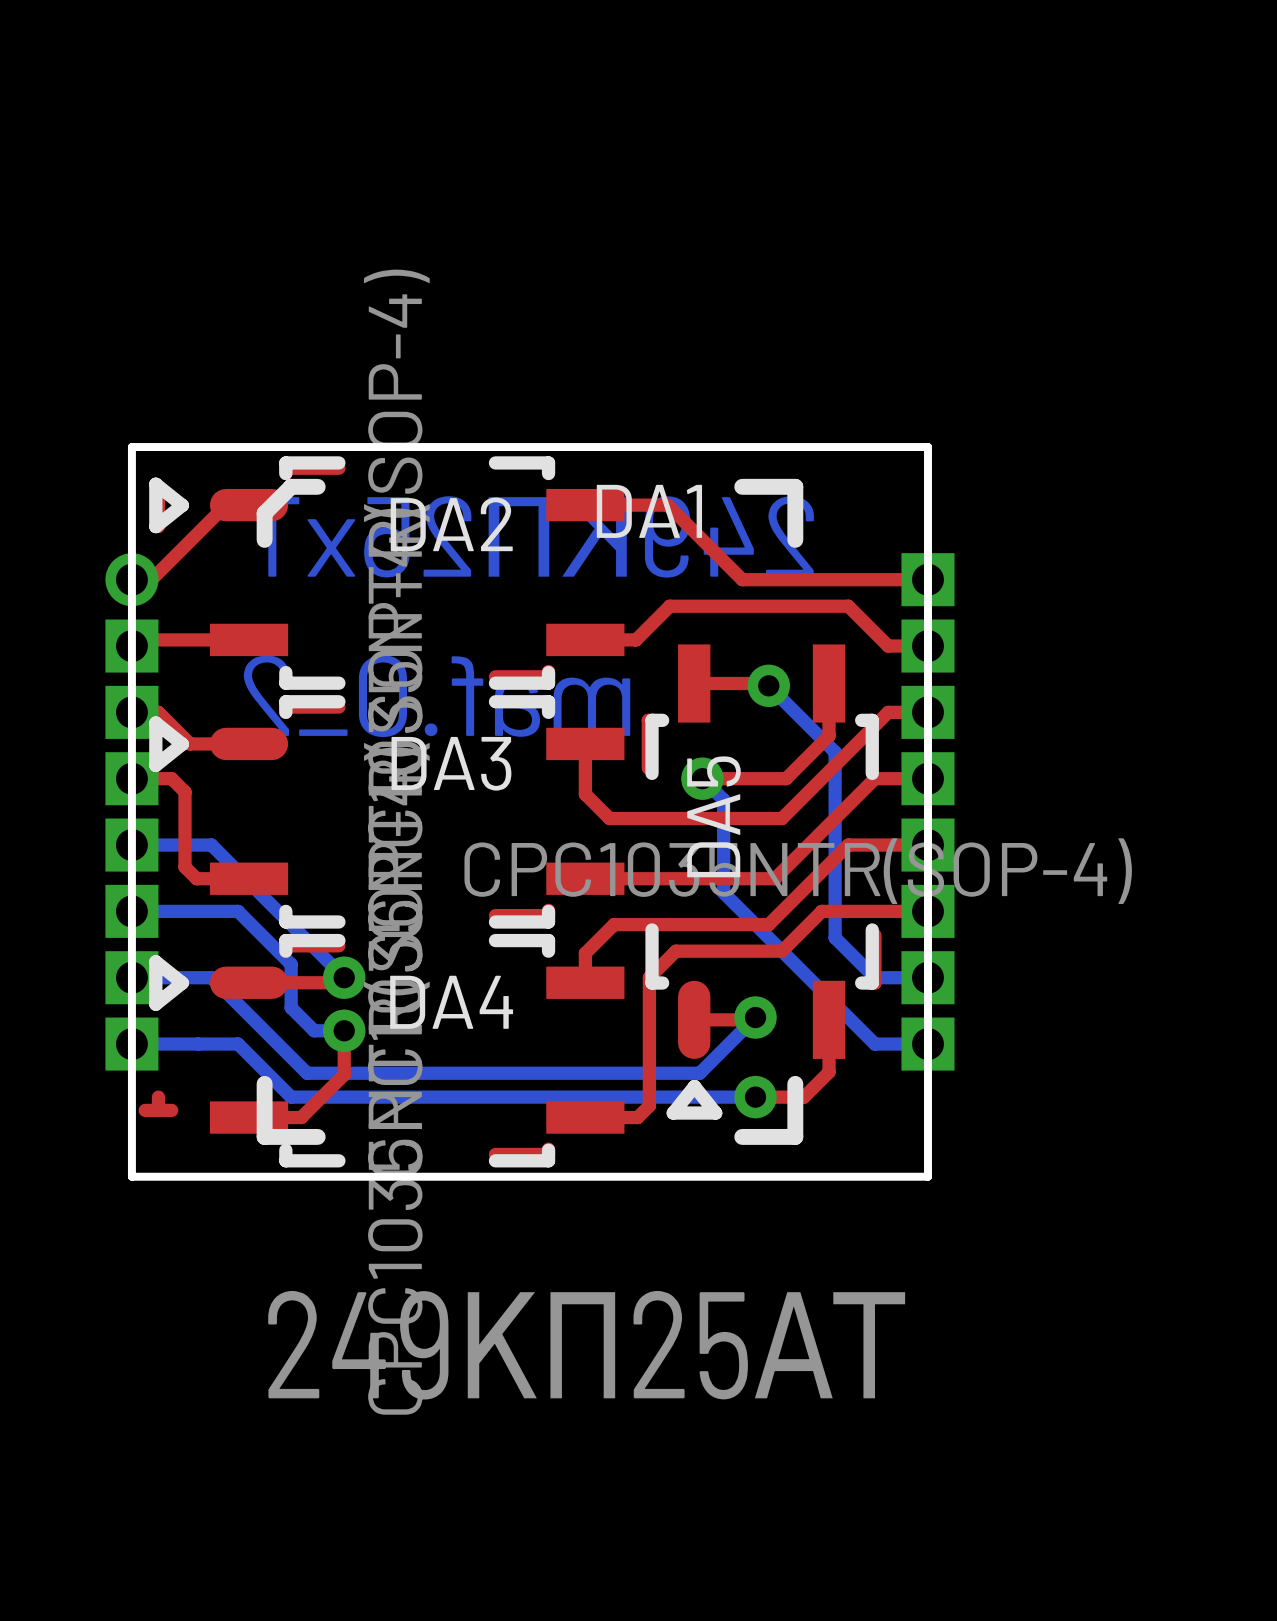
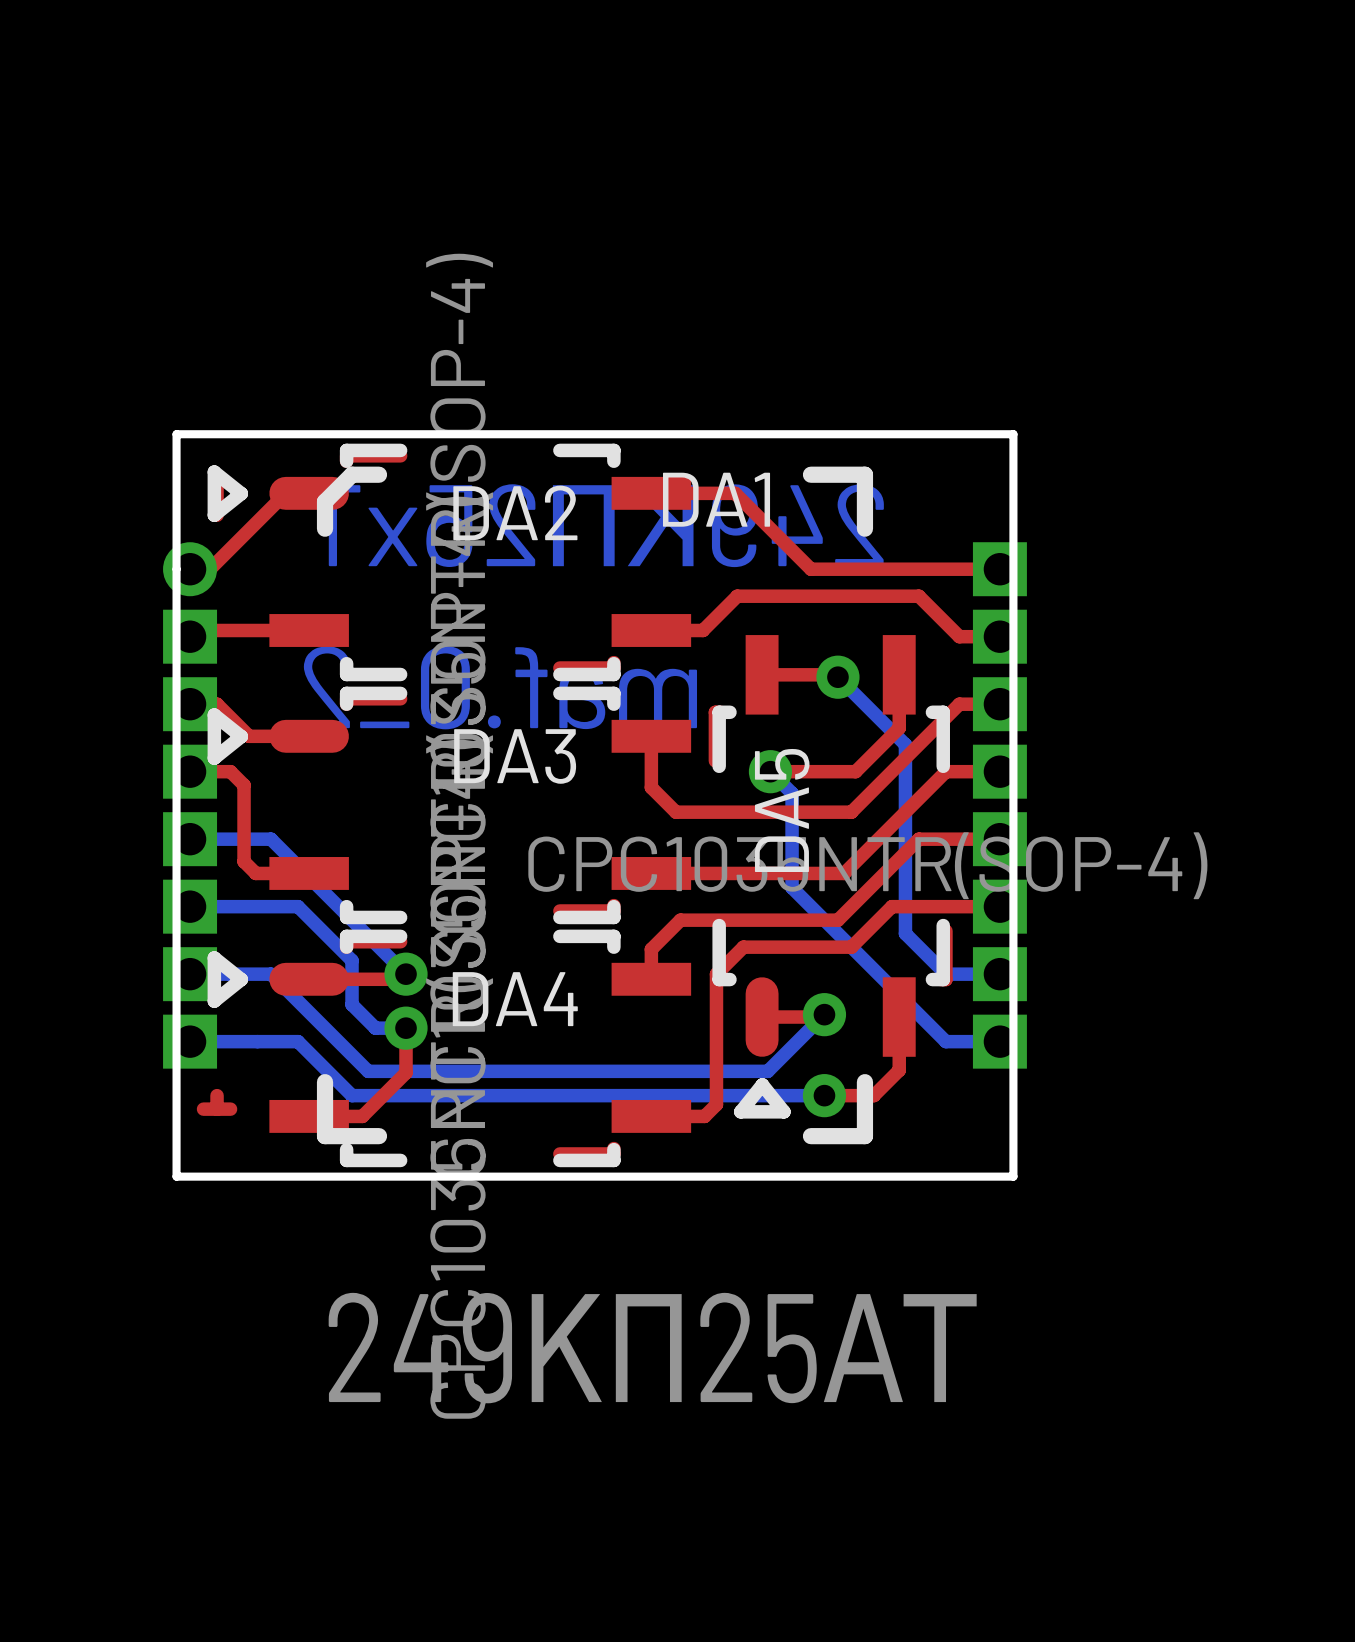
board edge: (131, 447) (131, 1176) -> (190, 434) (176, 434) (176, 1176) (190, 1176)
board edge: (927, 447) (927, 1176) -> (999, 434) (1013, 434) (1013, 1176) (999, 1176)

